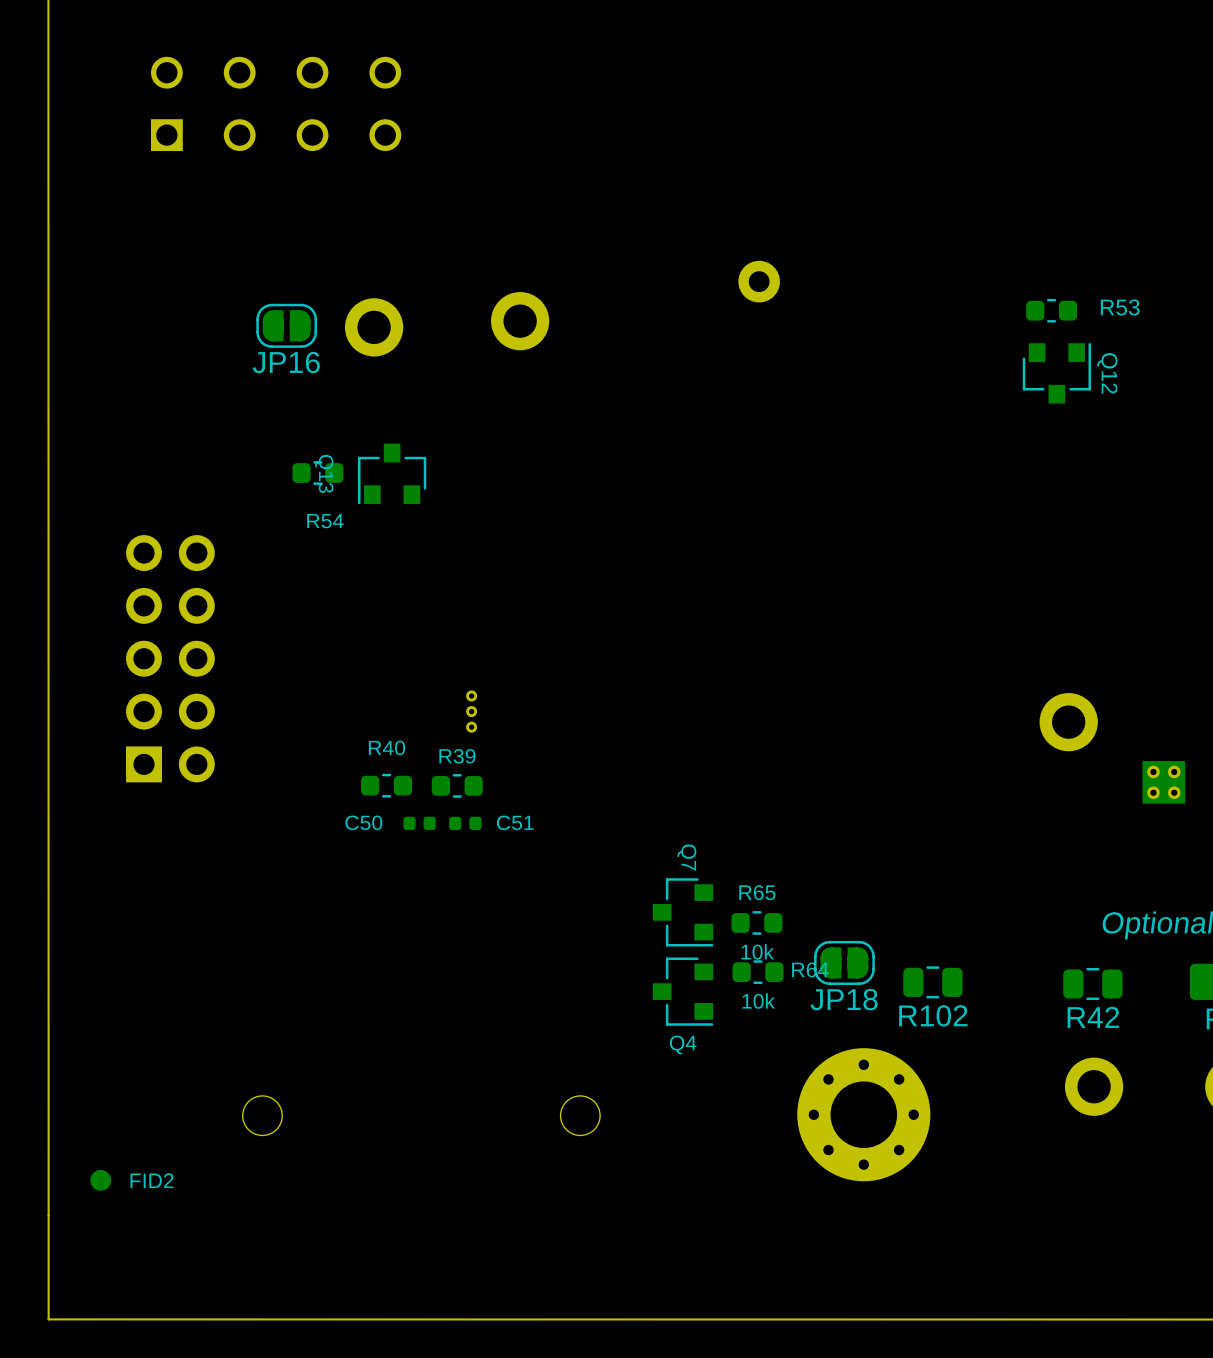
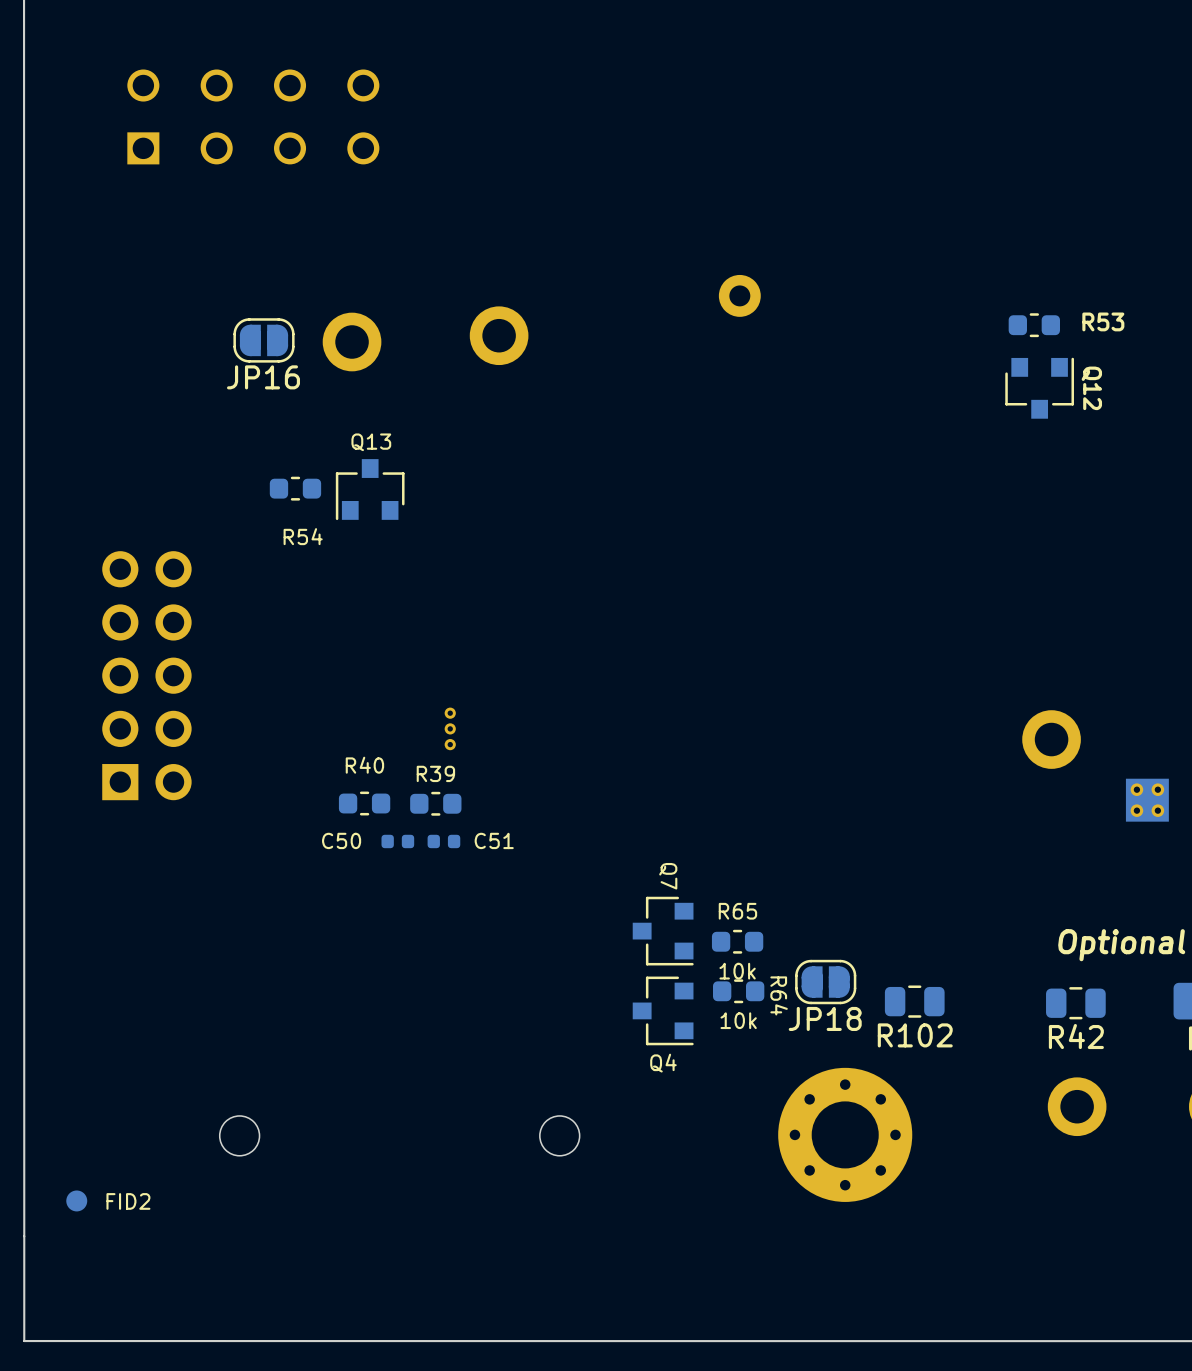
Q13 name rotation: 0° (324, 473) -> 90° counterclockwise (371, 442)
Q13 name position: Q13 (324, 473) -> Q13 (371, 442)
R64 name rotation: 0° (810, 969) -> 90° clockwise (779, 995)

